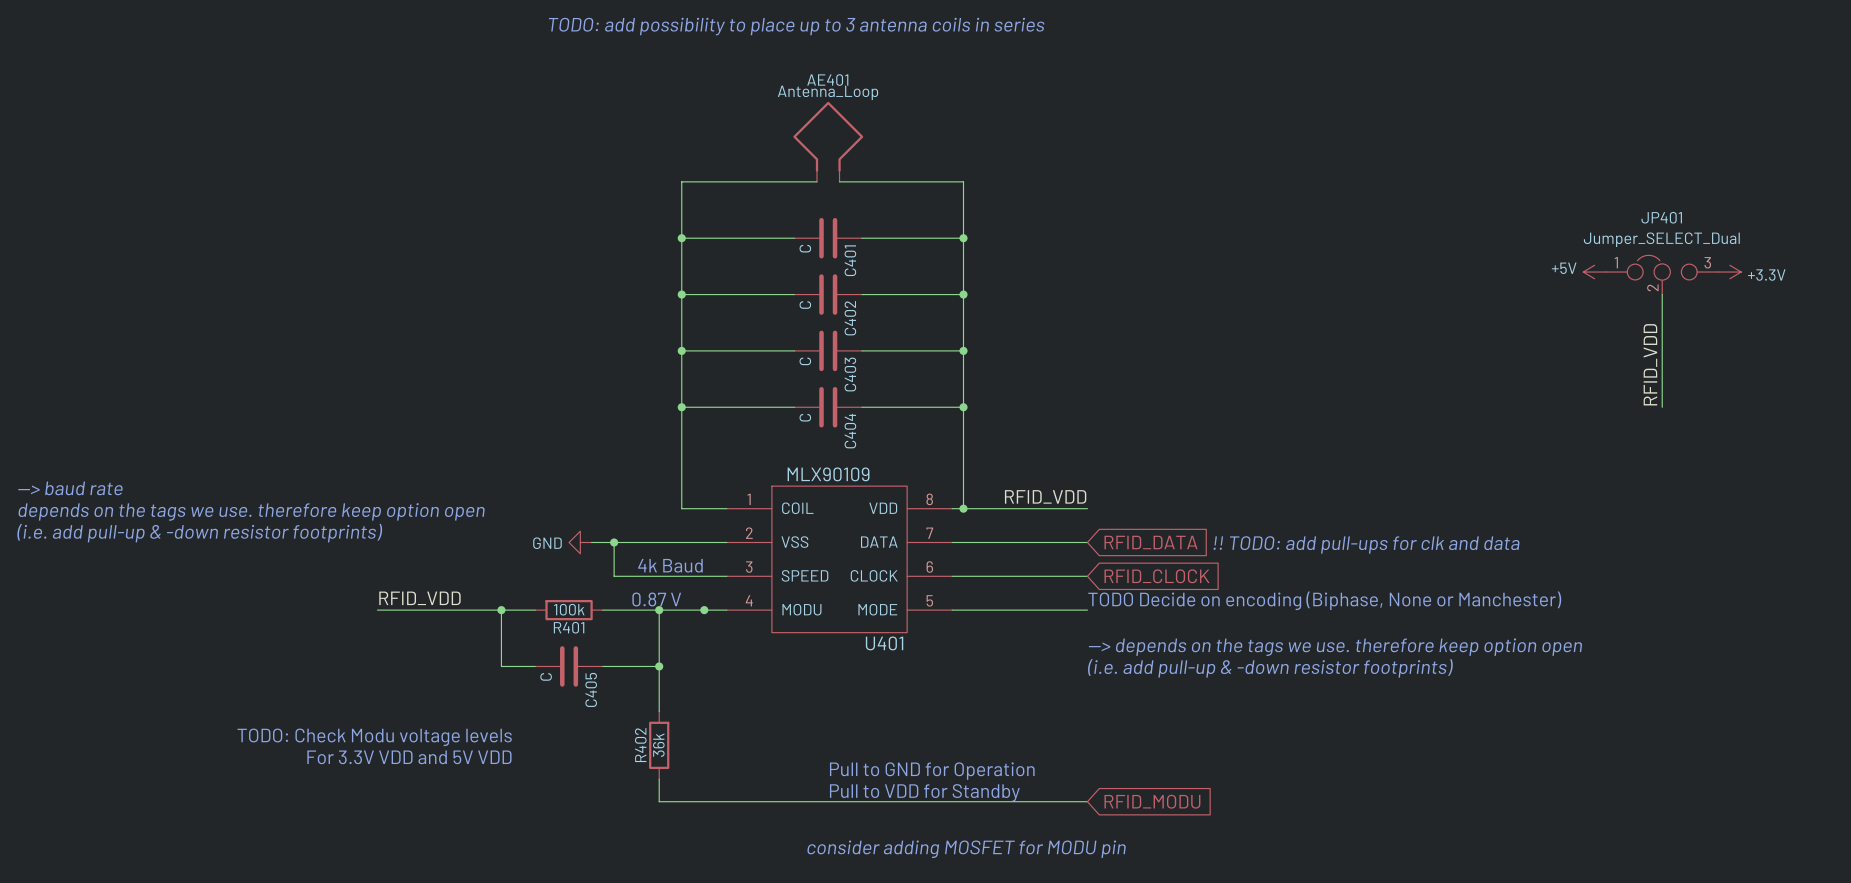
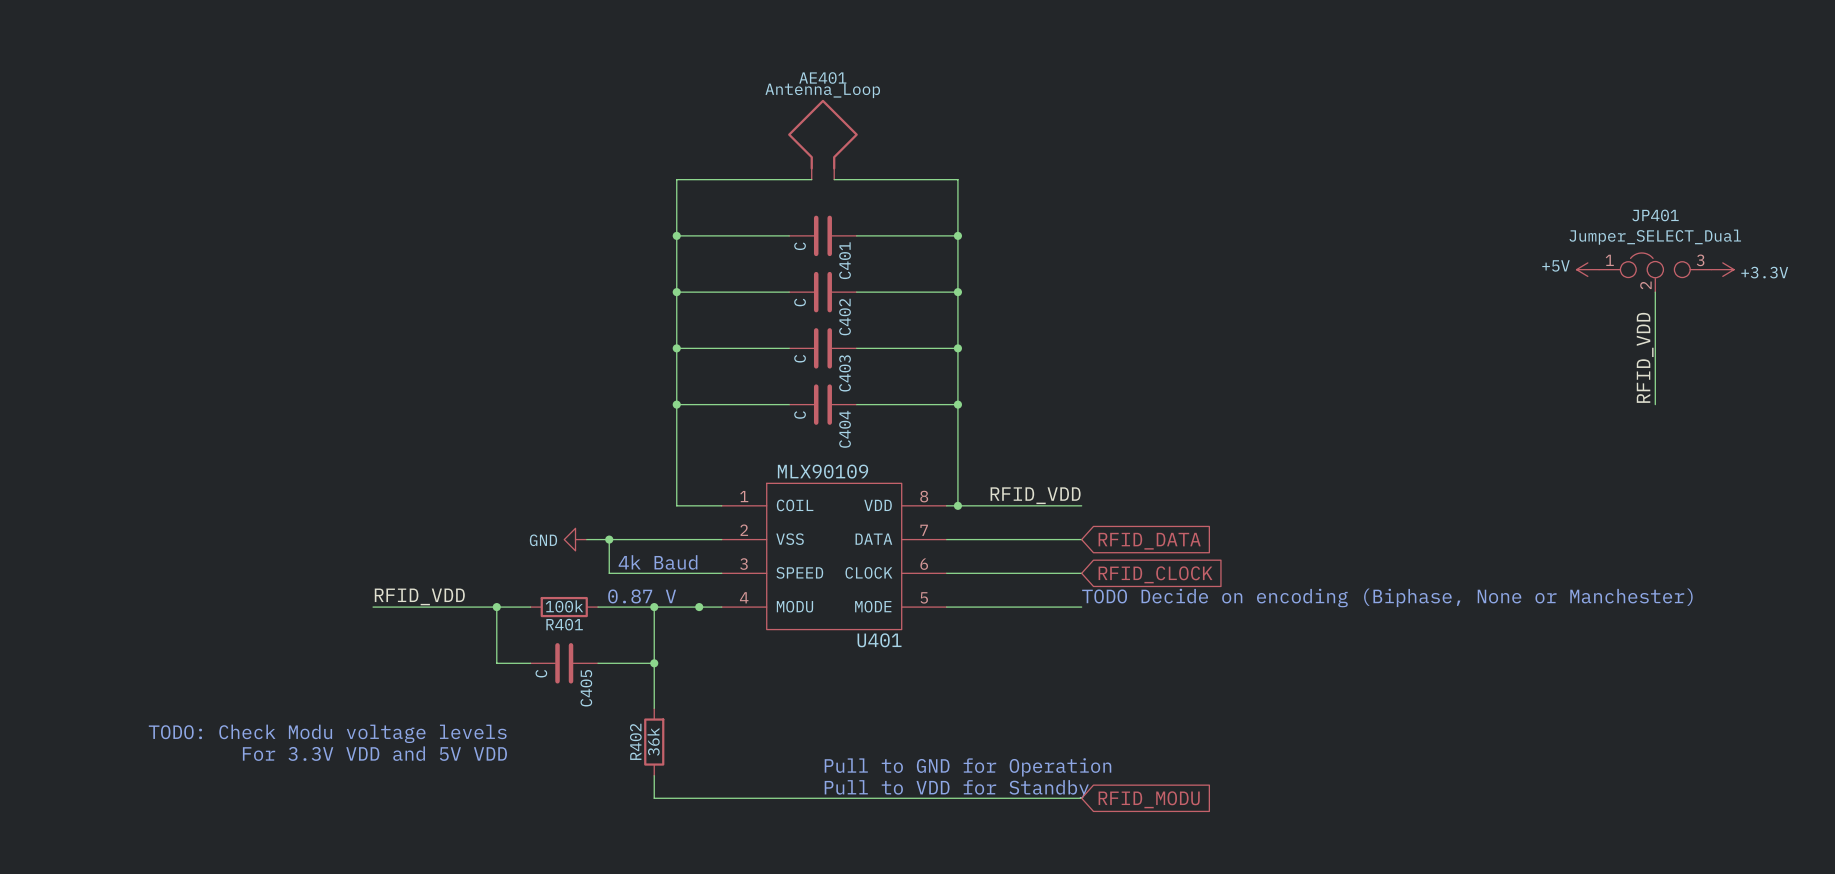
text: TODO: add possibility to place up to 3 antenna coils in series (796, 26) -> none
text: —> baud rate (70, 488) -> none
text: depends on the tags we use. therefore keep option open (251, 511) -> none
text: (i.e. add pull-up & -down resistor footprints) (199, 533) -> none
text: !! TODO: add pull-ups for clk and data (1366, 544) -> none
text: —> depends on the tags we use. therefore keep option open (1335, 647) -> none
text: (i.e. add pull-up & -down resistor footprints) (1270, 668) -> none
text: consider adding MOSFET for MODU pin (966, 849) -> none

